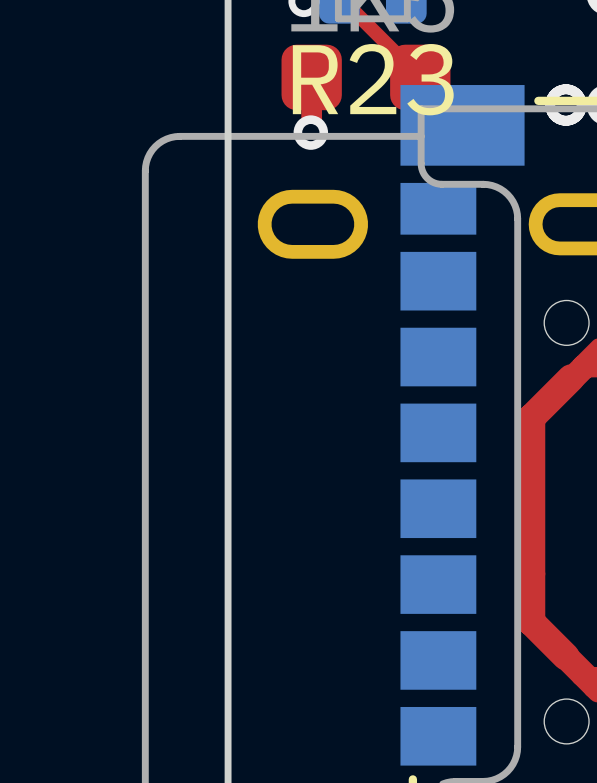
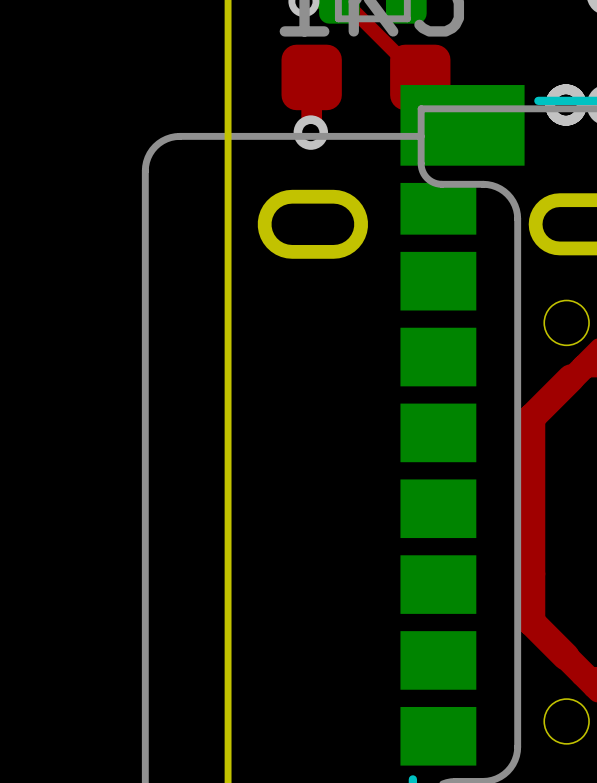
R23 name: R23 (373, 79) -> none

